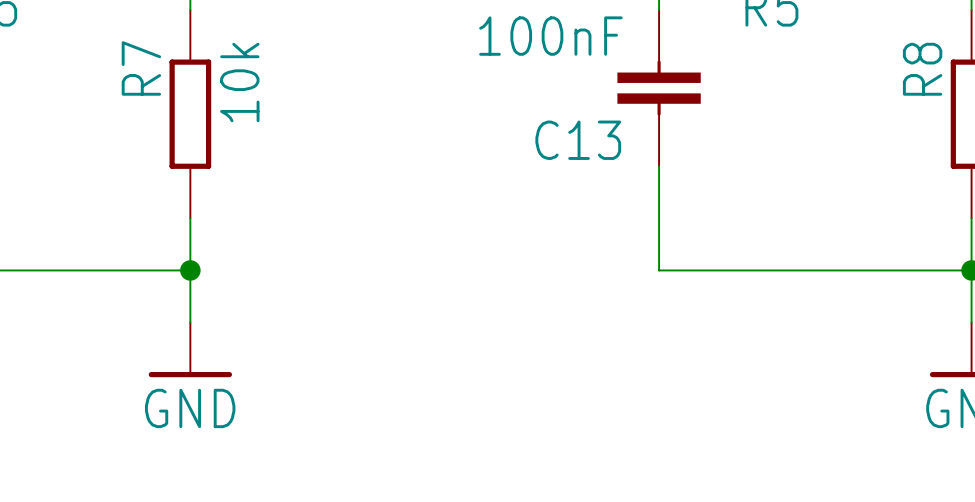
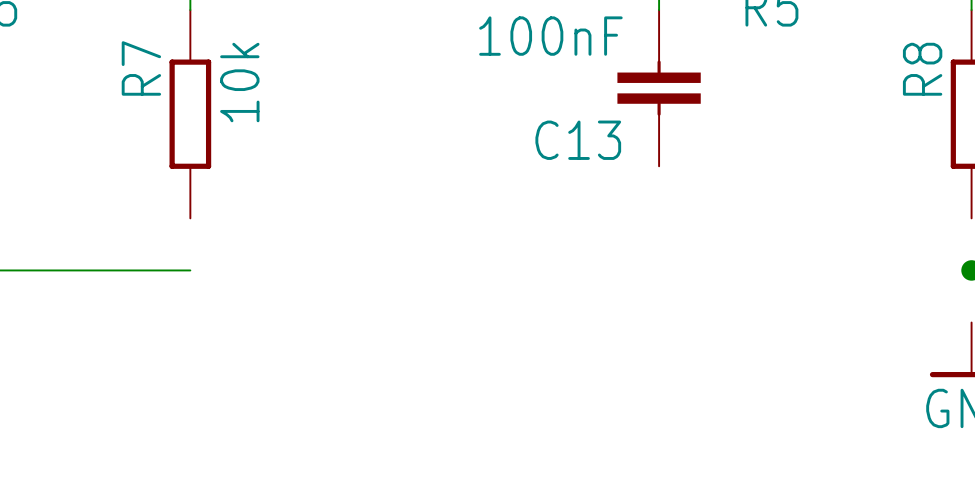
wire: (659, 166) (659, 270) (971, 270) -> none
wire: (190, 218) (190, 322) -> none
wire: (971, 218) (971, 322) -> none
junction: (190, 270) -> none
power symbol: GND (190, 349) -> none

